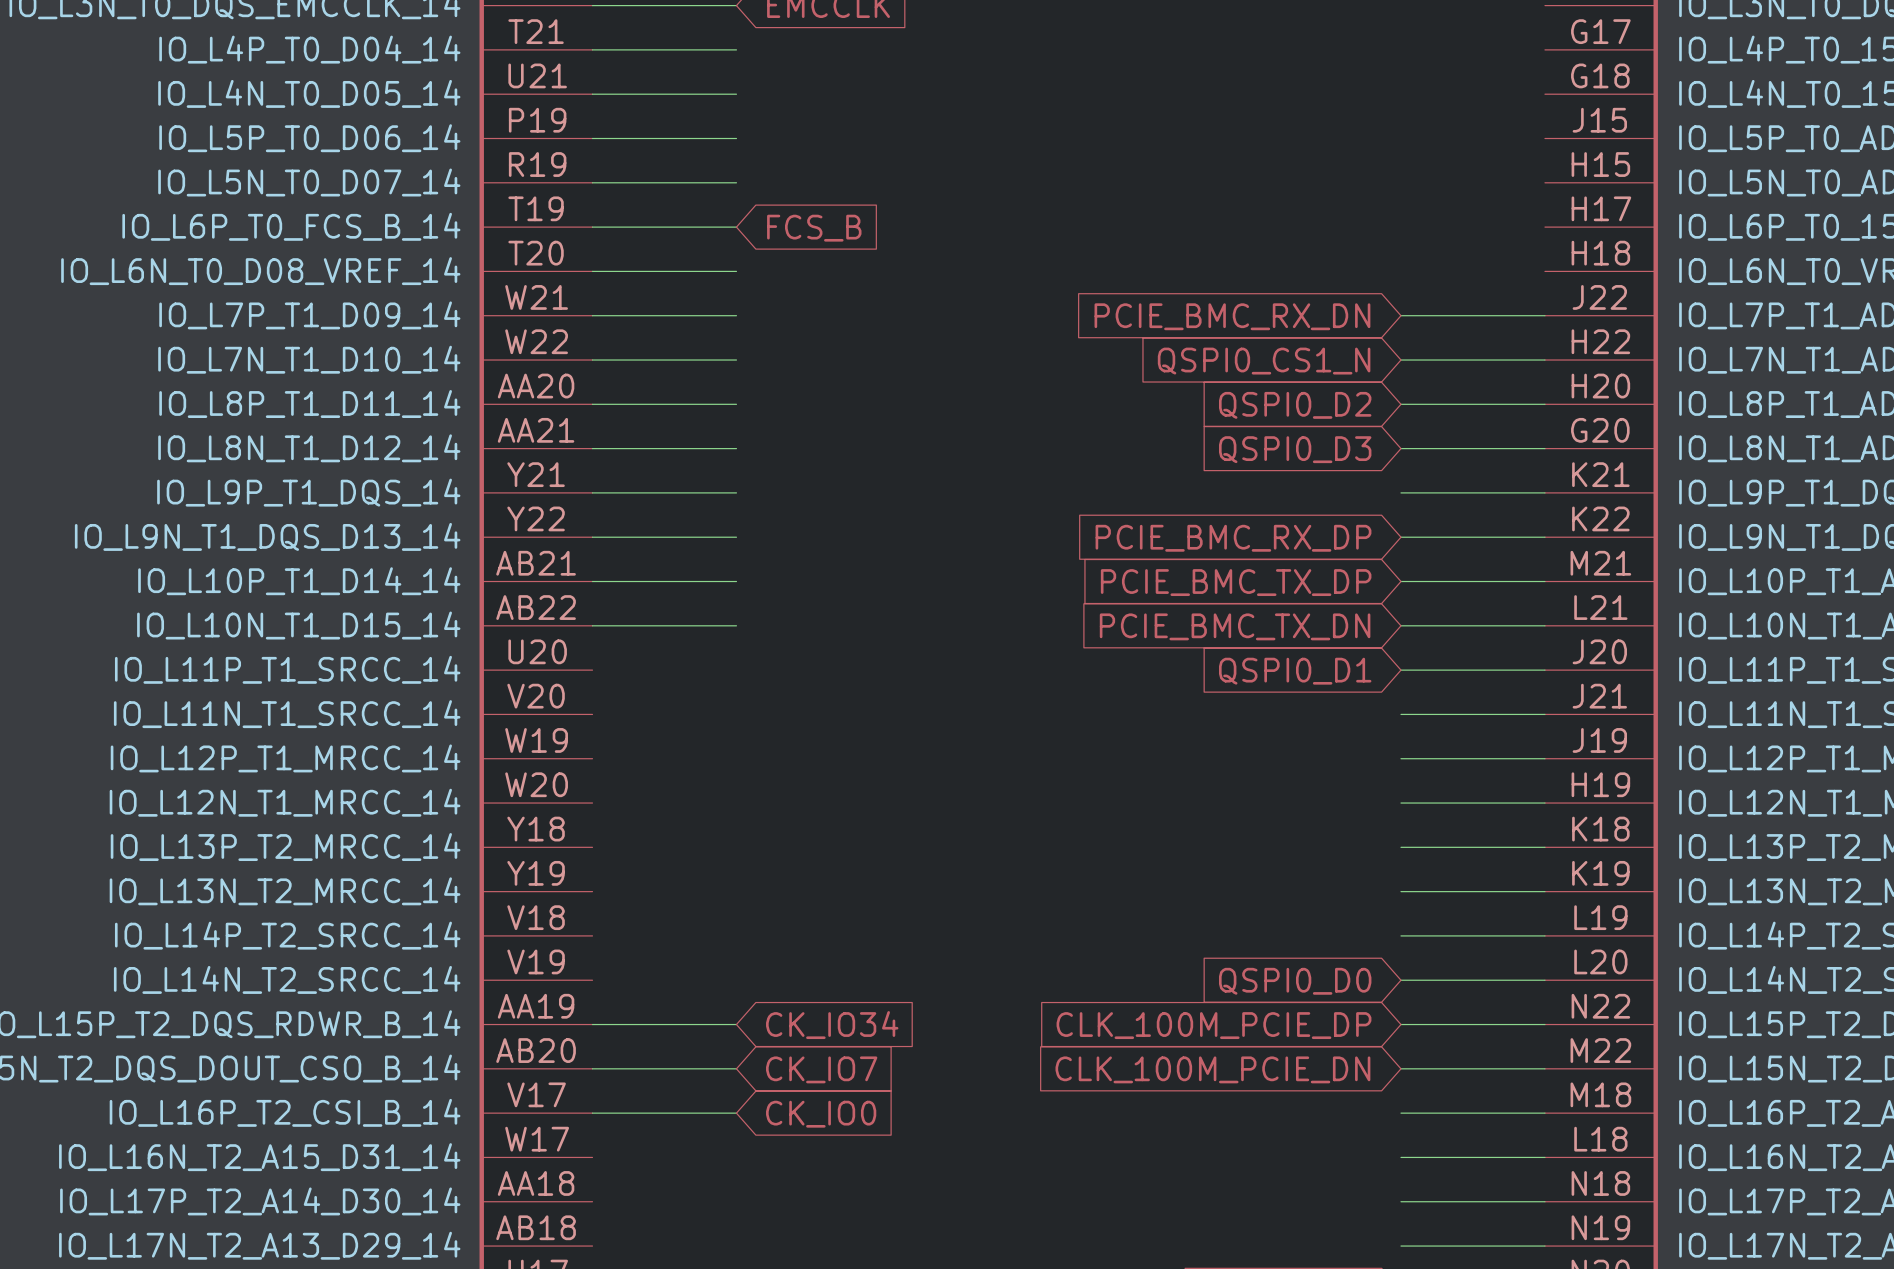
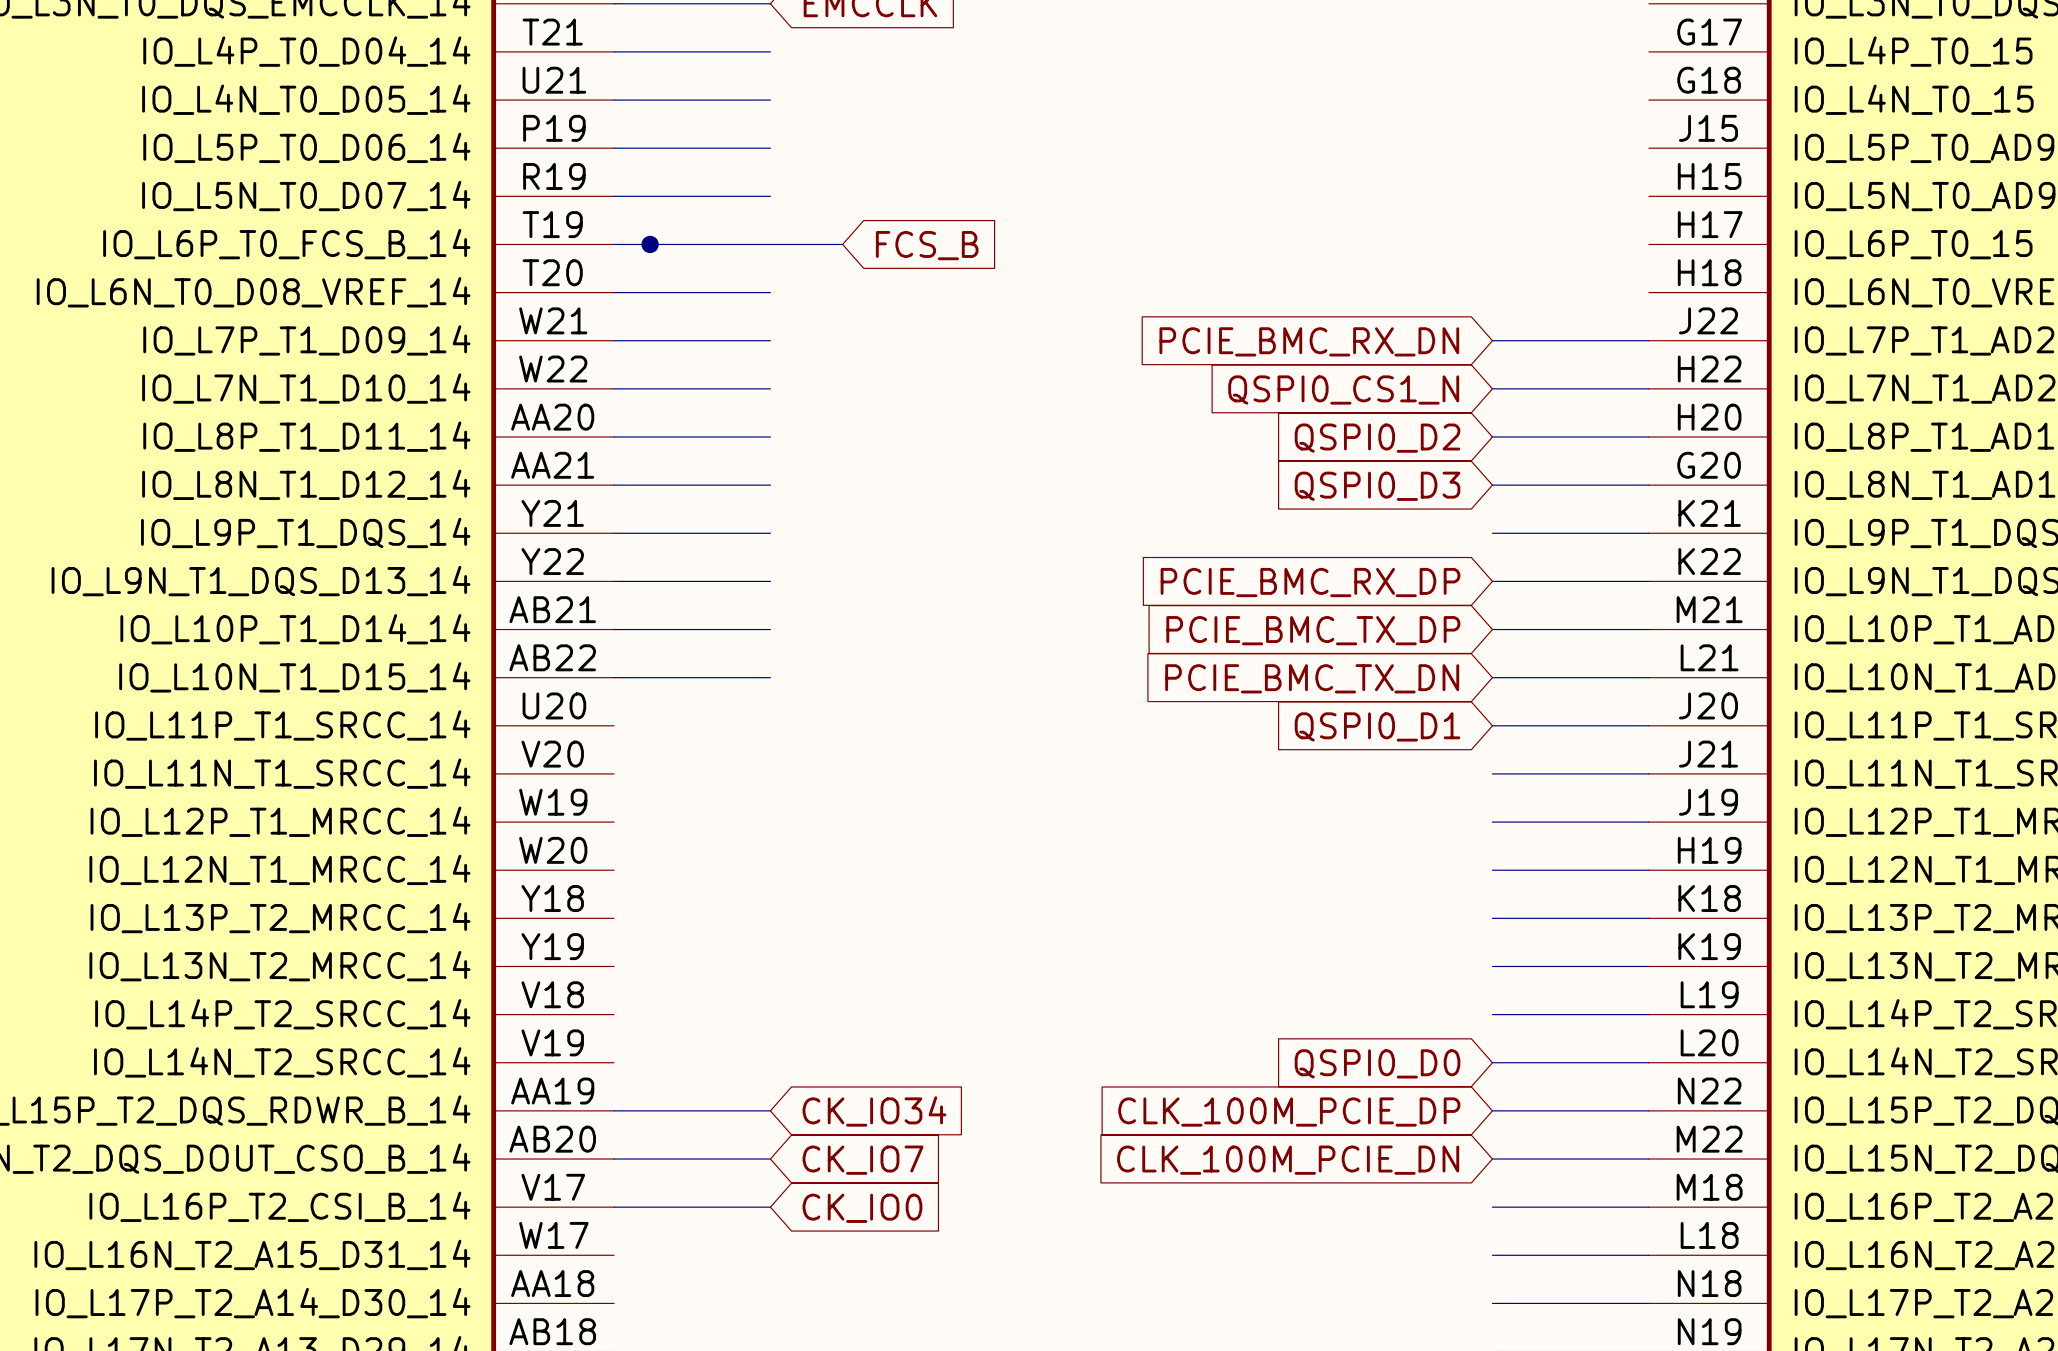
junction: none -> (650, 244)
wire: none -> (770, 244) (842, 244)
global label position: FCS_B (814, 228) -> FCS_B (927, 245)

